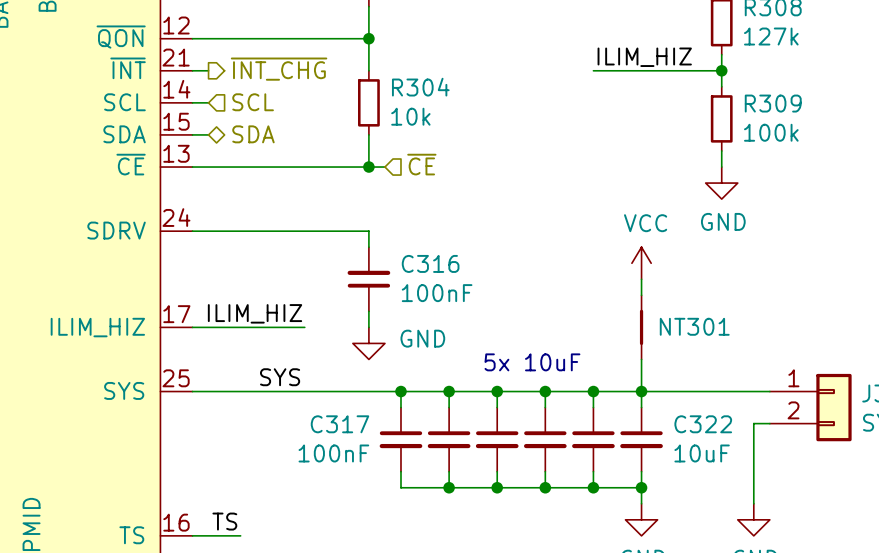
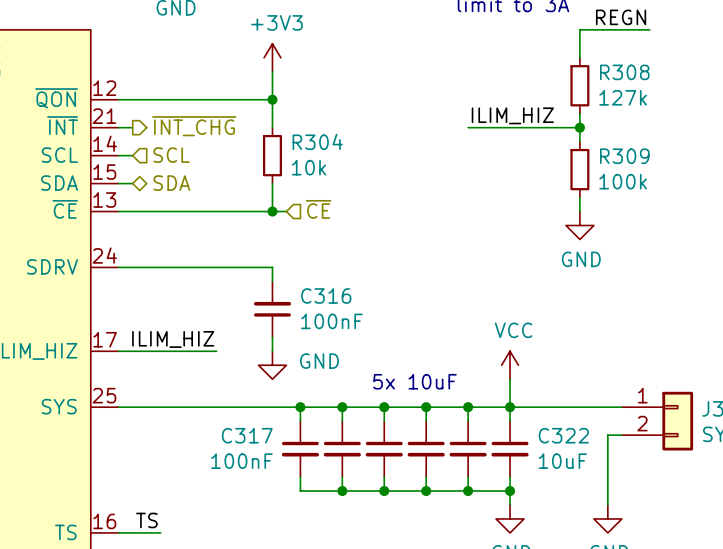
power symbol position: VCC (641, 263) -> VCC (510, 365)
wire: (641, 279) (641, 295) -> none
NT301: (641, 327) -> none
label: SYS (280, 377) -> none

